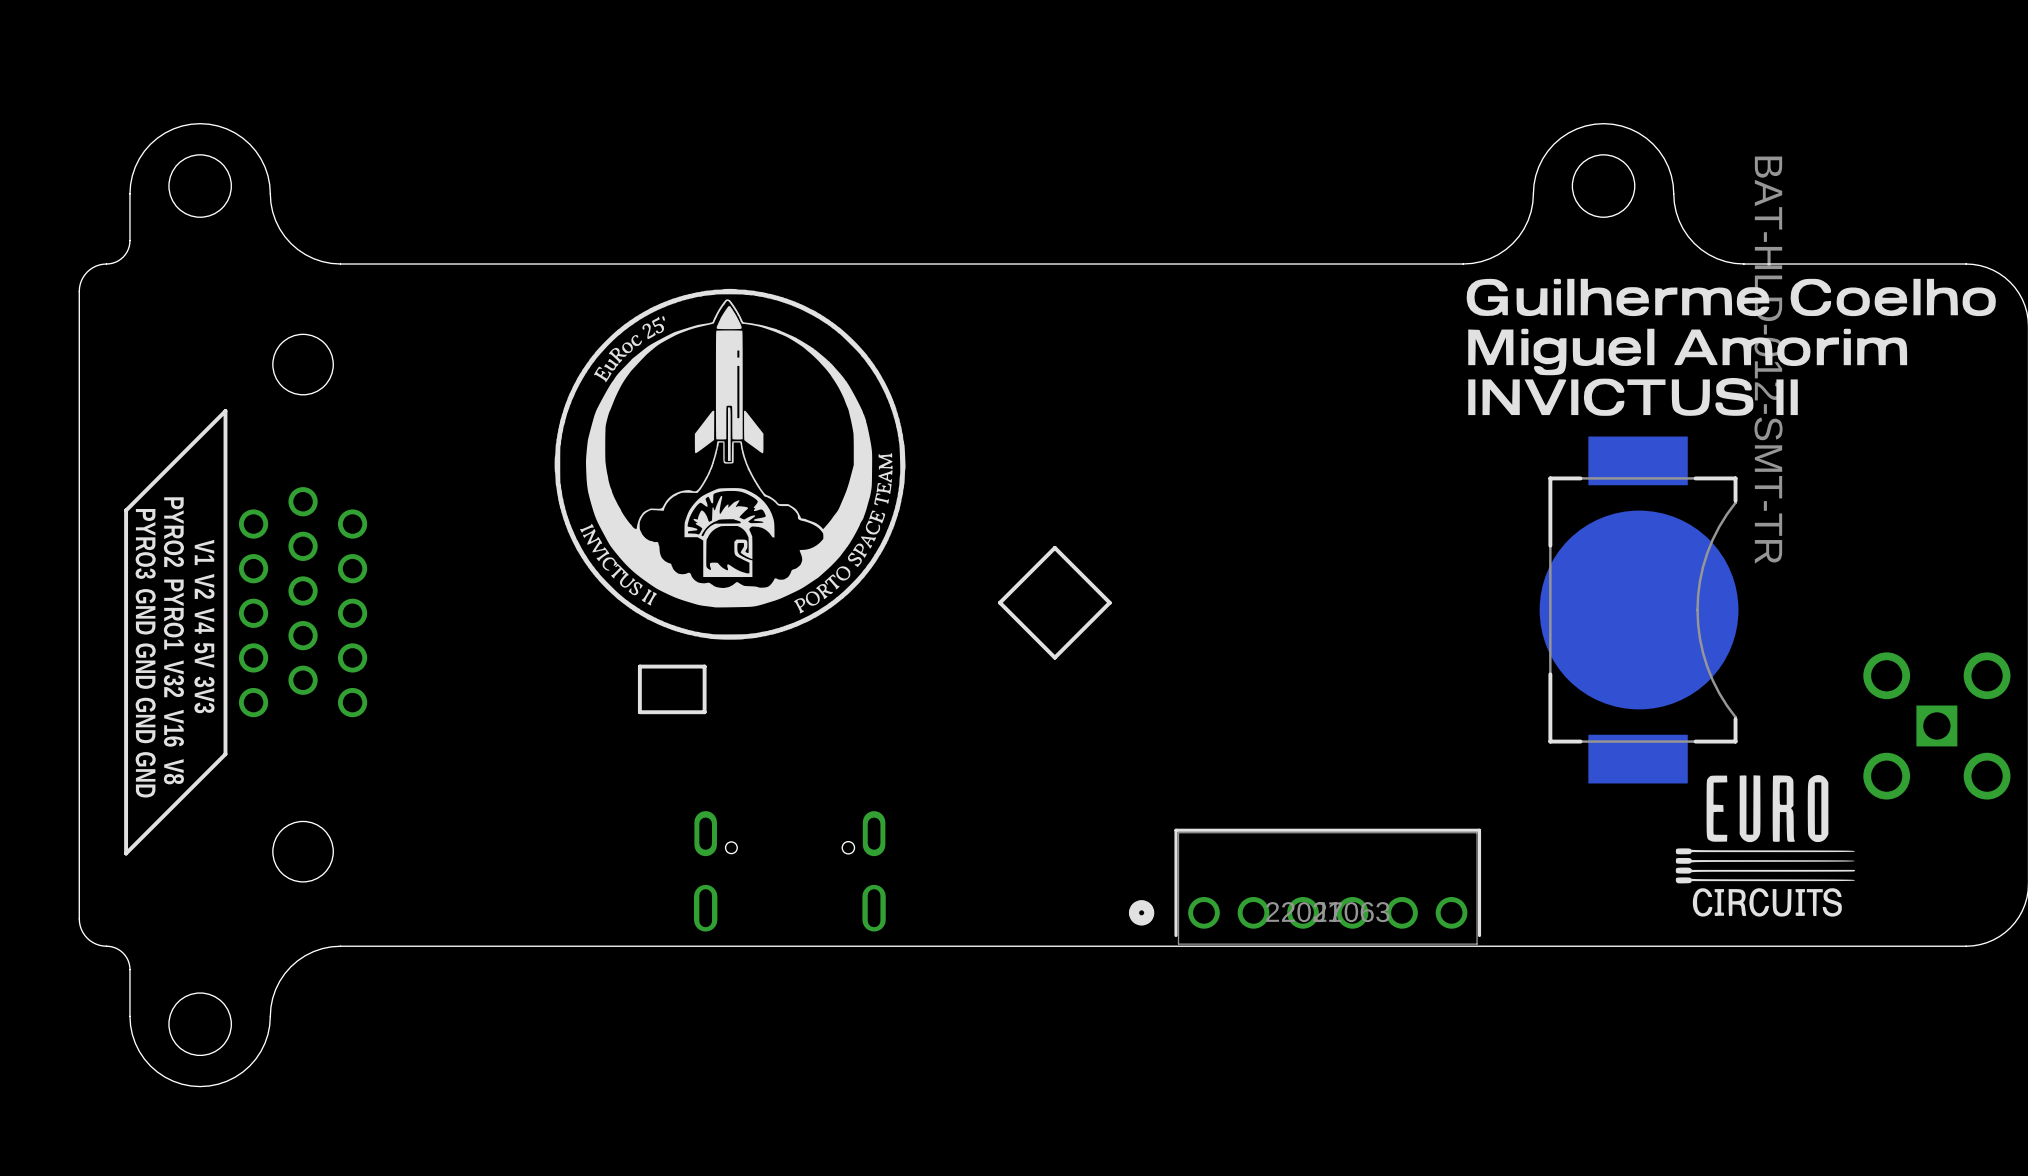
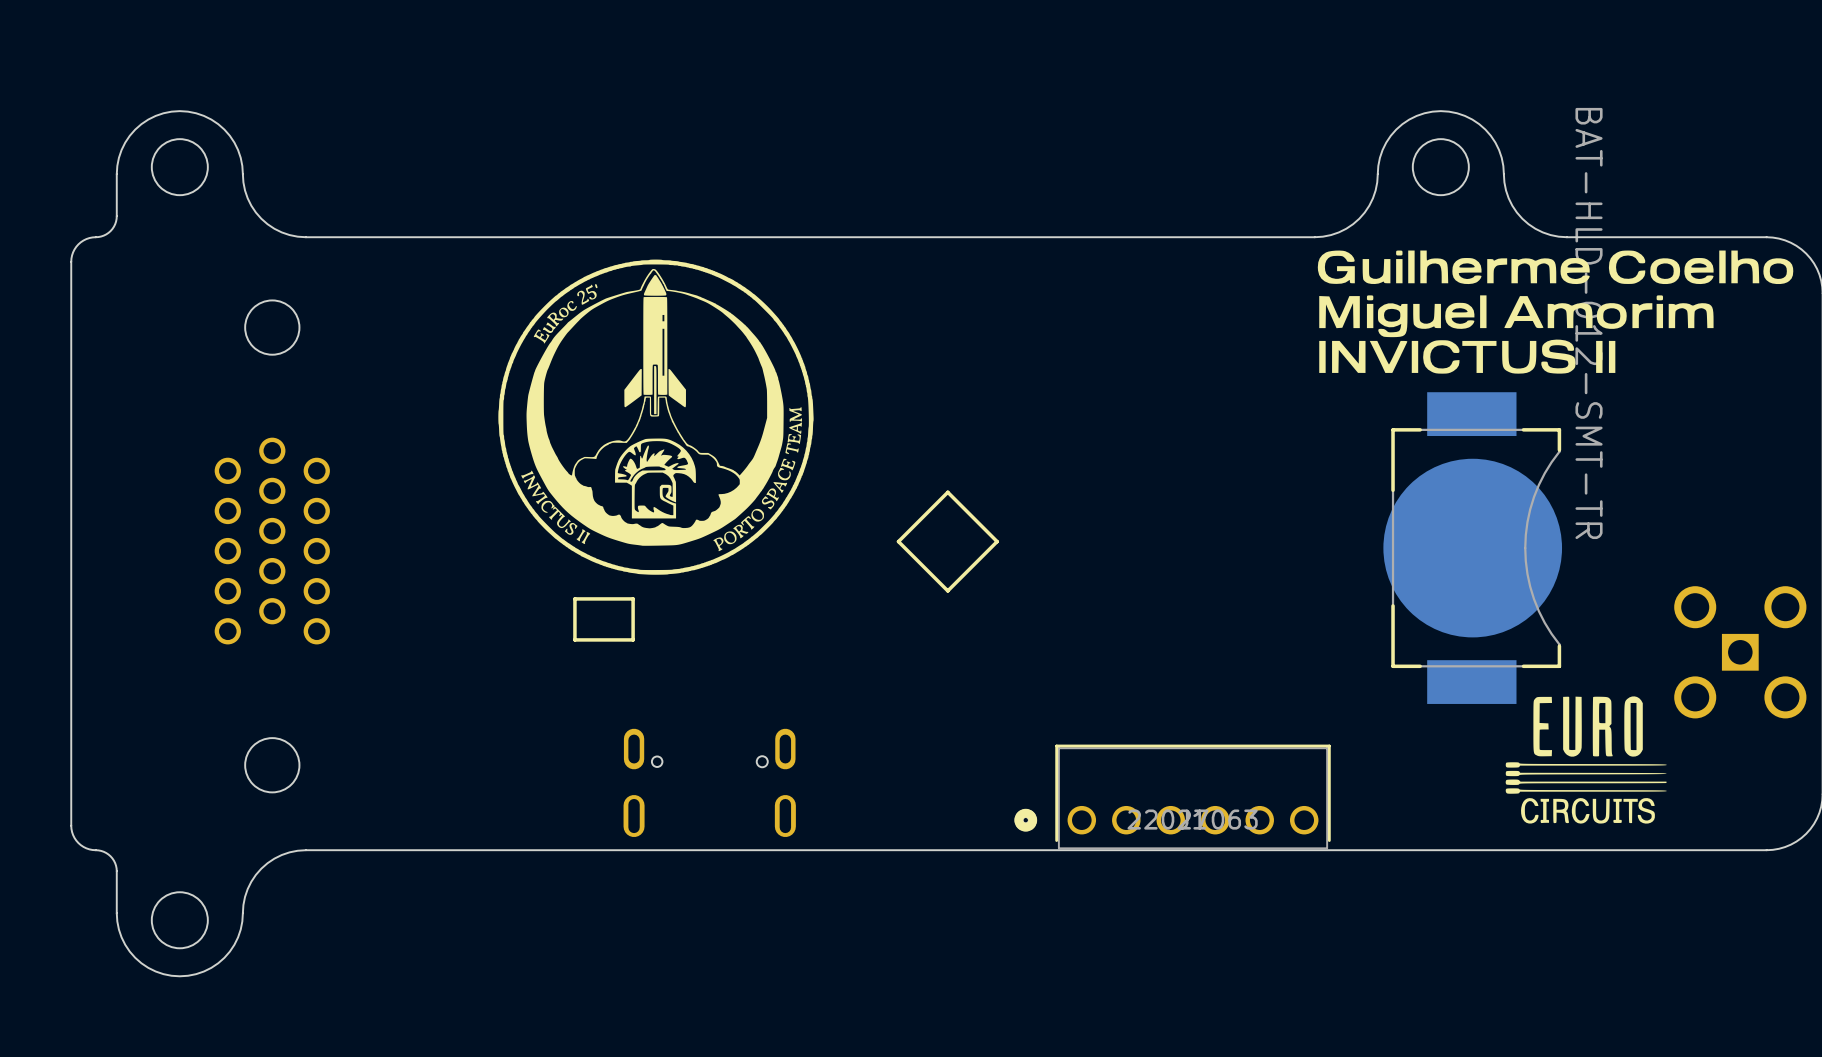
line: (225, 411) (225, 754) (126, 853) (126, 510) (225, 411) -> none
text: PYRO2 (173, 532) -> none
text: PYRO3 (145, 543) -> none
text: V1 (204, 552) -> none
text: V2 (204, 586) -> none
text: GND (145, 611) -> none
text: PYRO1 (173, 614) -> none
text: V4 (204, 620) -> none
text: 5V (204, 655) -> none
text: GND (145, 666) -> none
text: V32 (173, 678) -> none
text: 3V3 (204, 694) -> none
text: GND (145, 720) -> none
text: V16 (173, 728) -> none
text: V8 (173, 771) -> none
text: GND (145, 774) -> none

